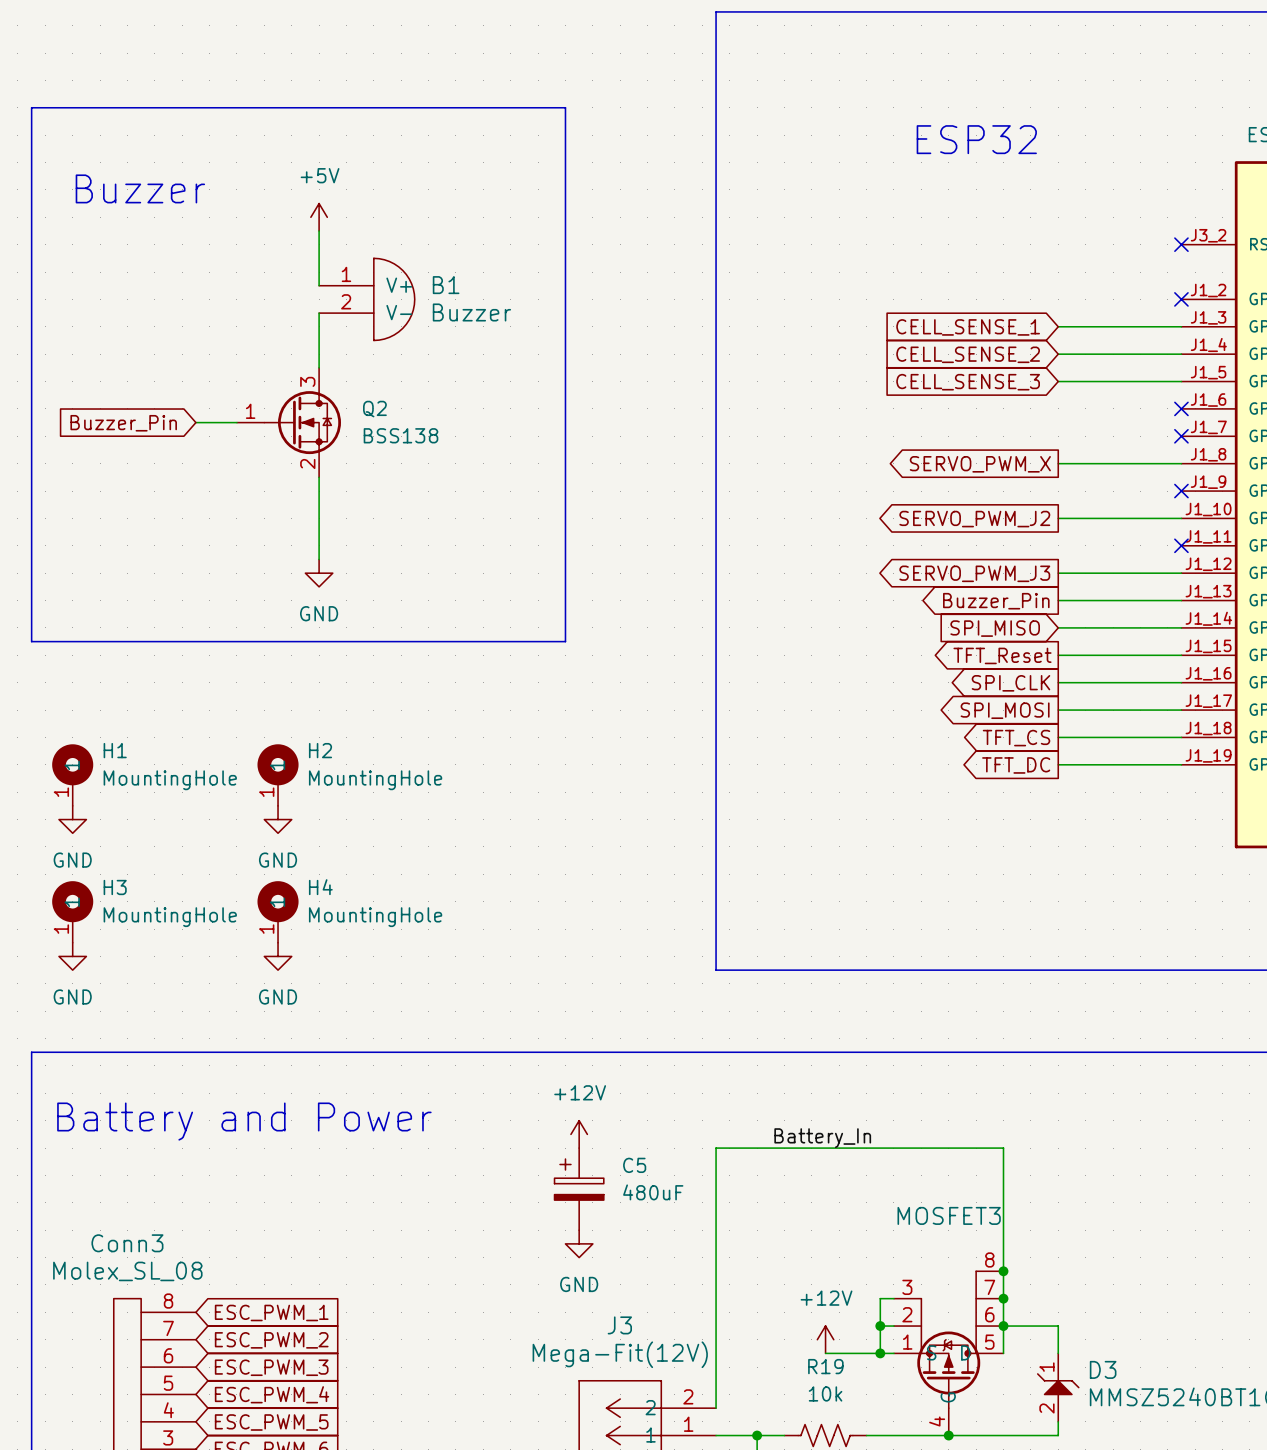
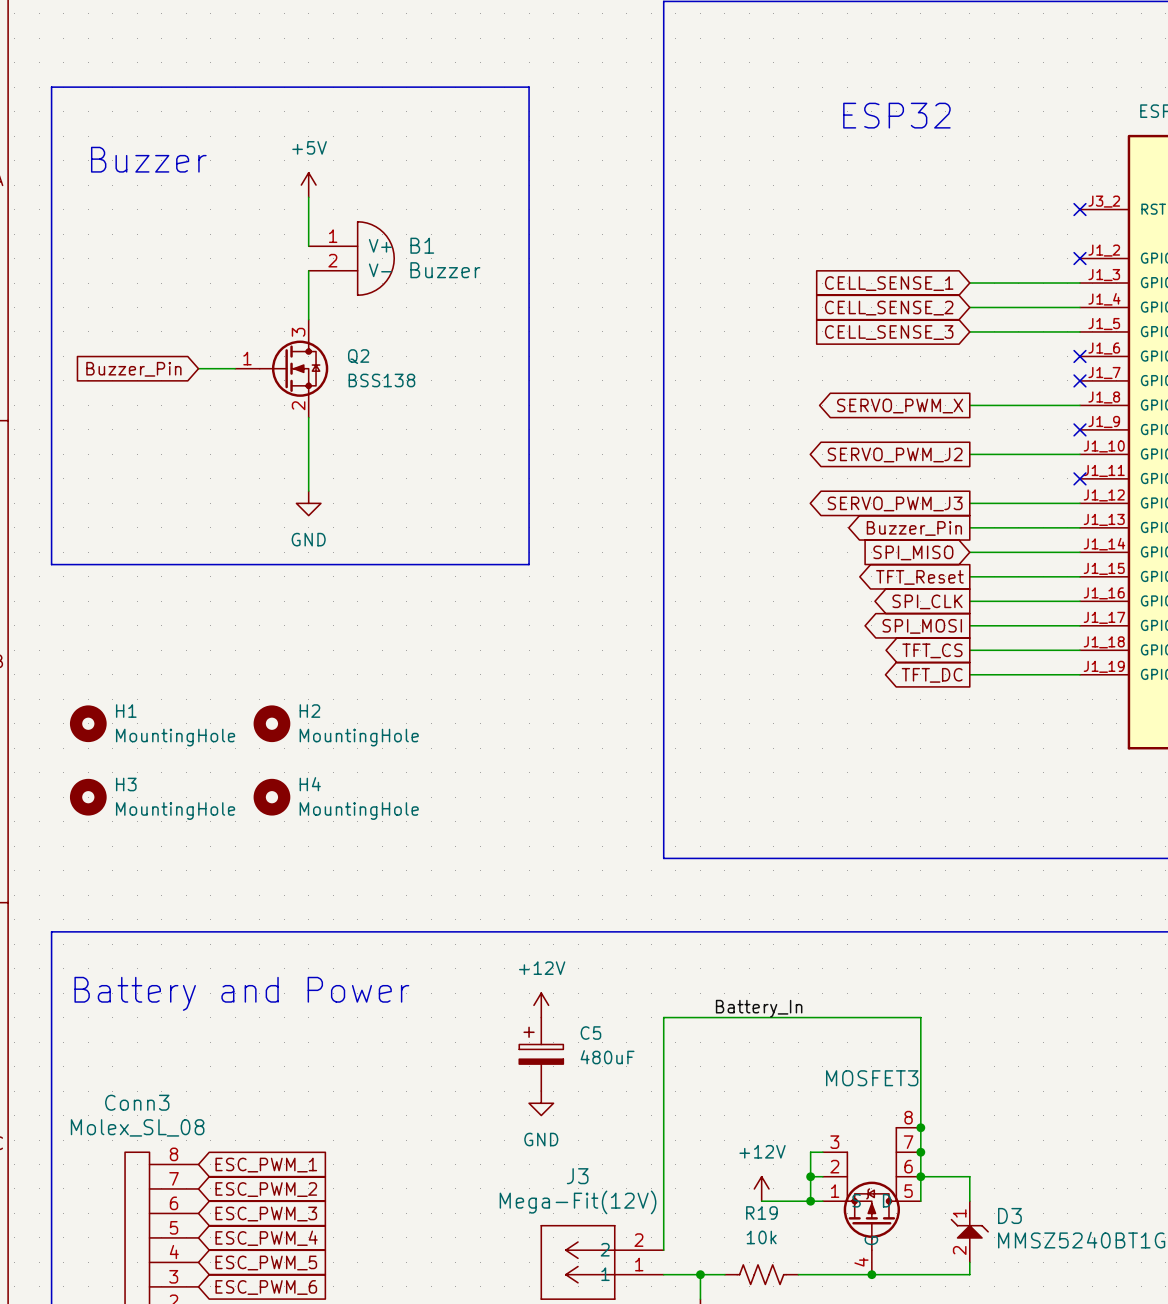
H1 symbol: [52, 744, 94, 806] -> [69, 705, 107, 743]
H2 symbol: [257, 744, 299, 806] -> [253, 705, 291, 743]
power symbol: GND (72, 819) -> none
power symbol: GND (278, 819) -> none
H3 symbol: [52, 881, 94, 943] -> [69, 778, 107, 816]
H4 symbol: [257, 881, 299, 943] -> [253, 778, 291, 816]
power symbol: GND (72, 956) -> none
power symbol: GND (278, 956) -> none

